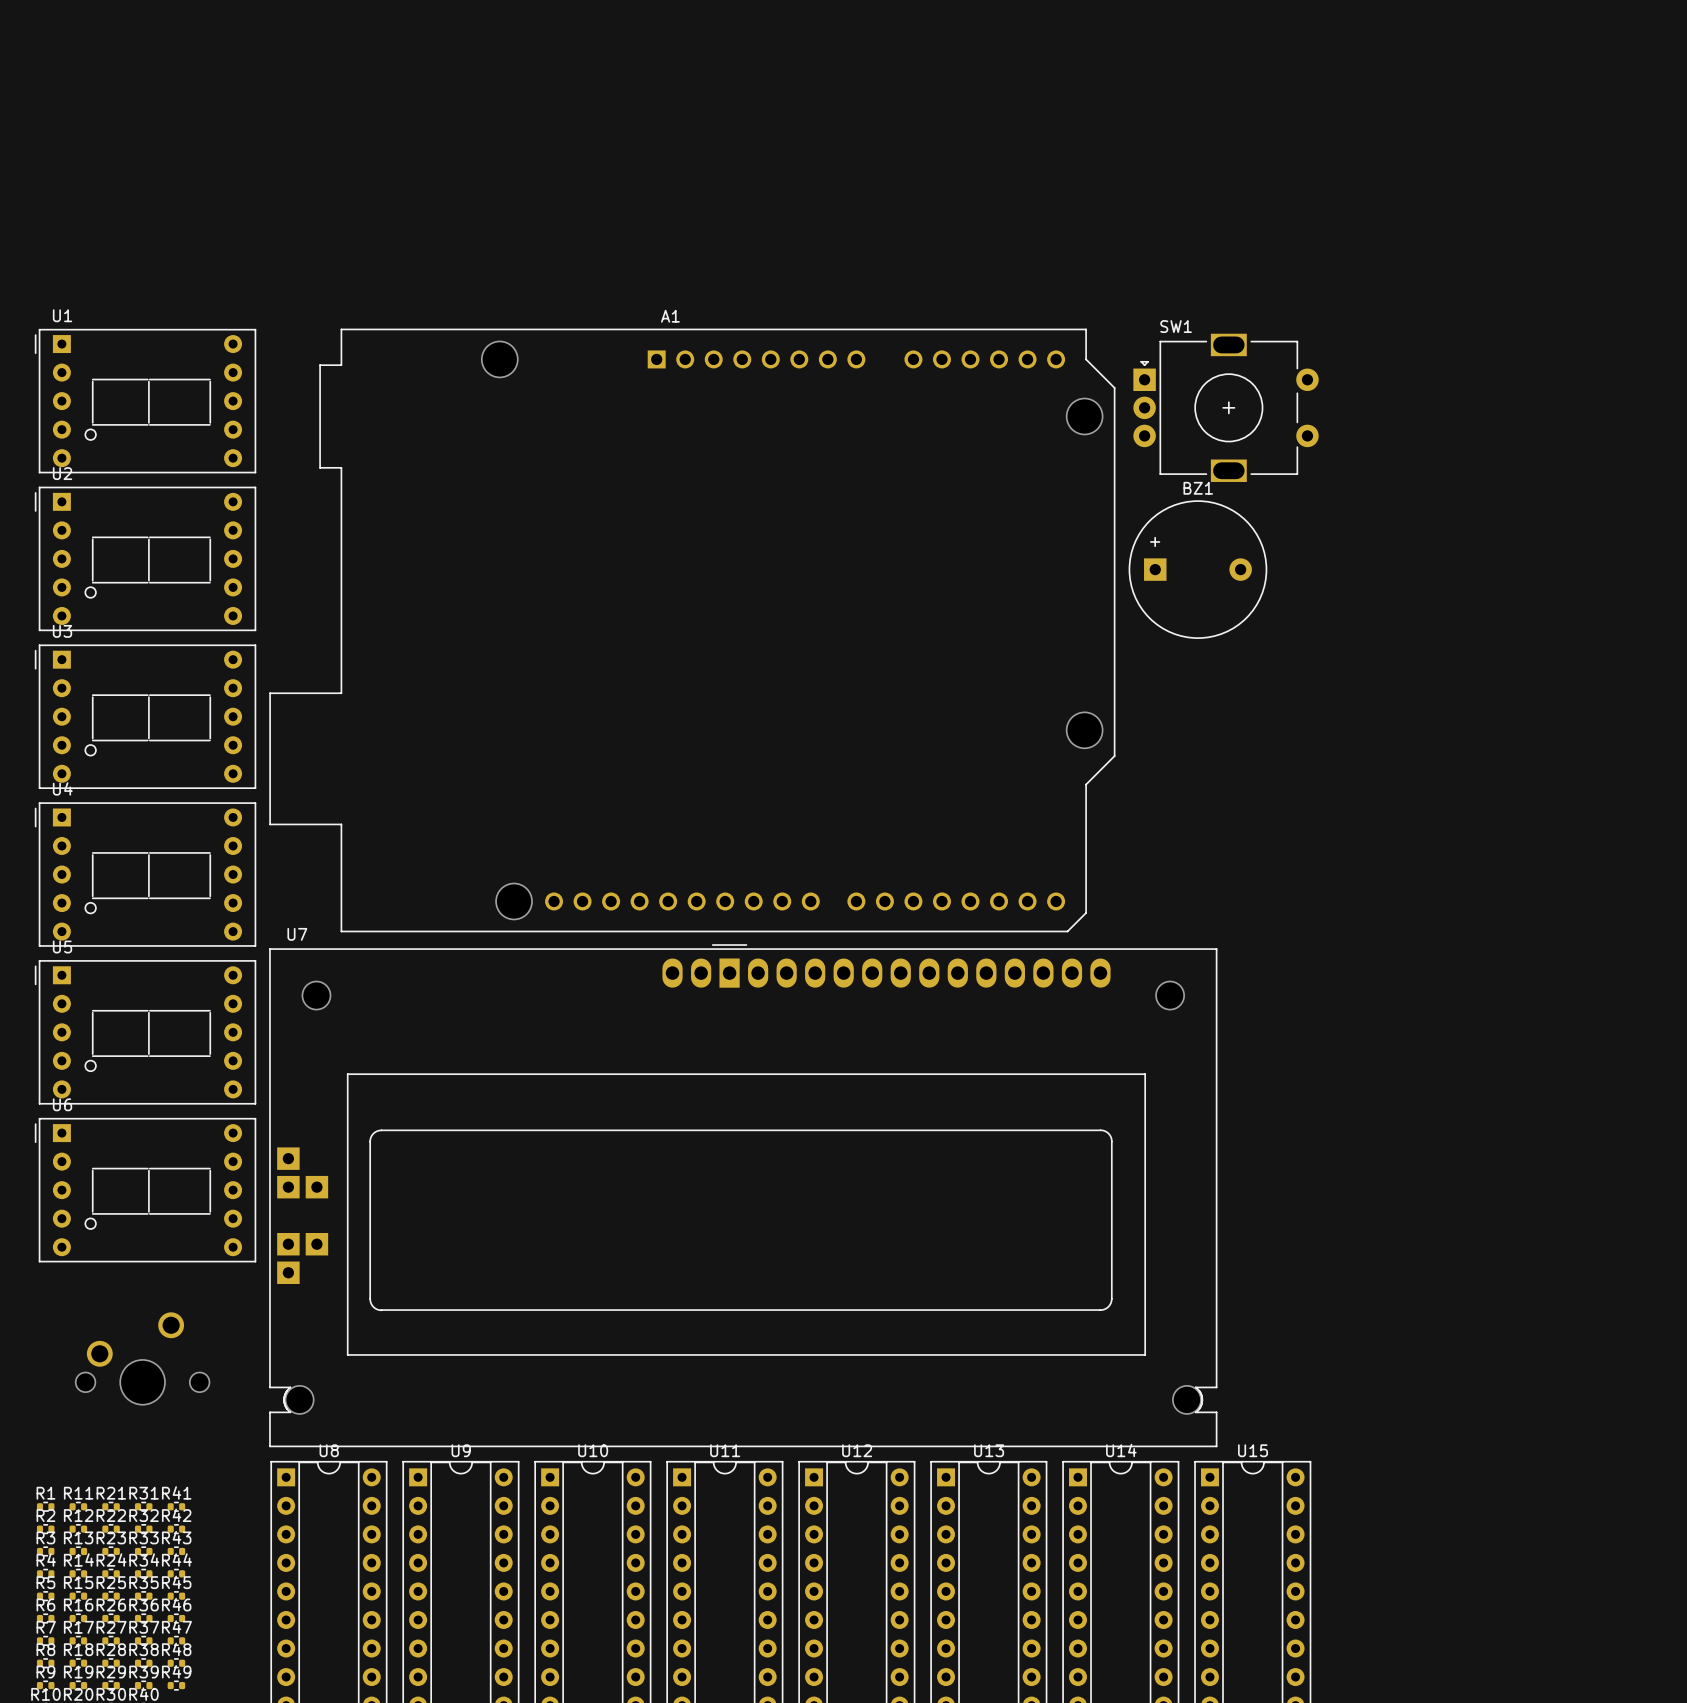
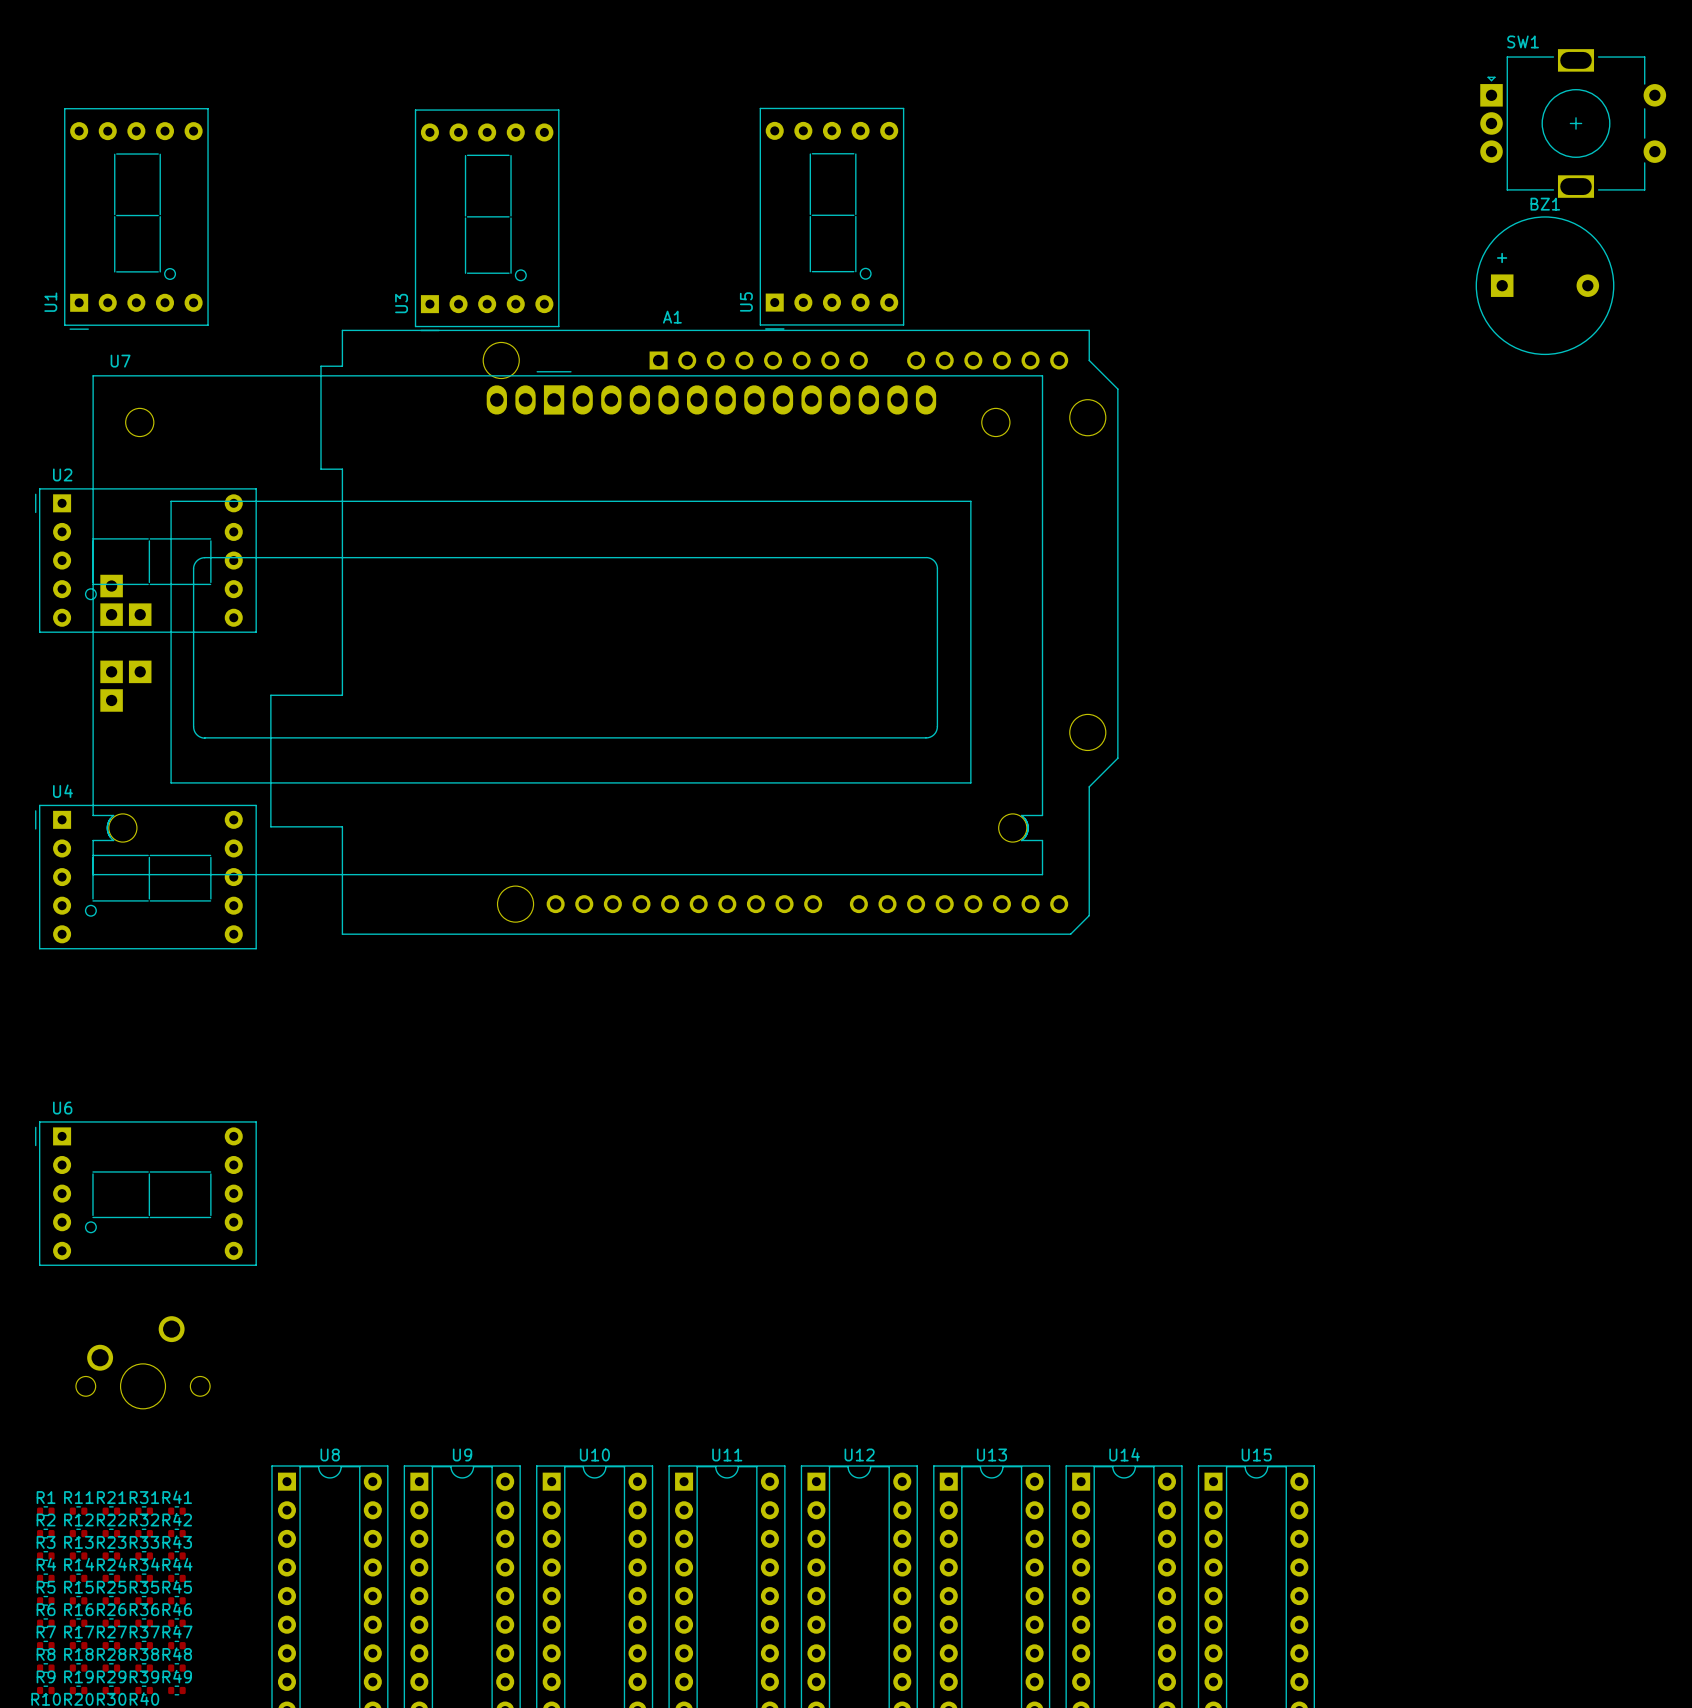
U1 rotation: 0° (145, 401) -> 90° counterclockwise (136, 218)
U1 position: (145, 401) -> (136, 218)
SW1 position: (1226, 407) -> (1573, 123)
BZ1 position: (1197, 569) -> (1545, 285)
U3 rotation: 0° (145, 716) -> 90° counterclockwise (487, 220)
U3 position: (145, 716) -> (487, 220)
U5 rotation: 0° (145, 1032) -> 90° counterclockwise (831, 218)
U5 position: (145, 1032) -> (831, 218)
U7 position: (743, 1195) -> (567, 623)

